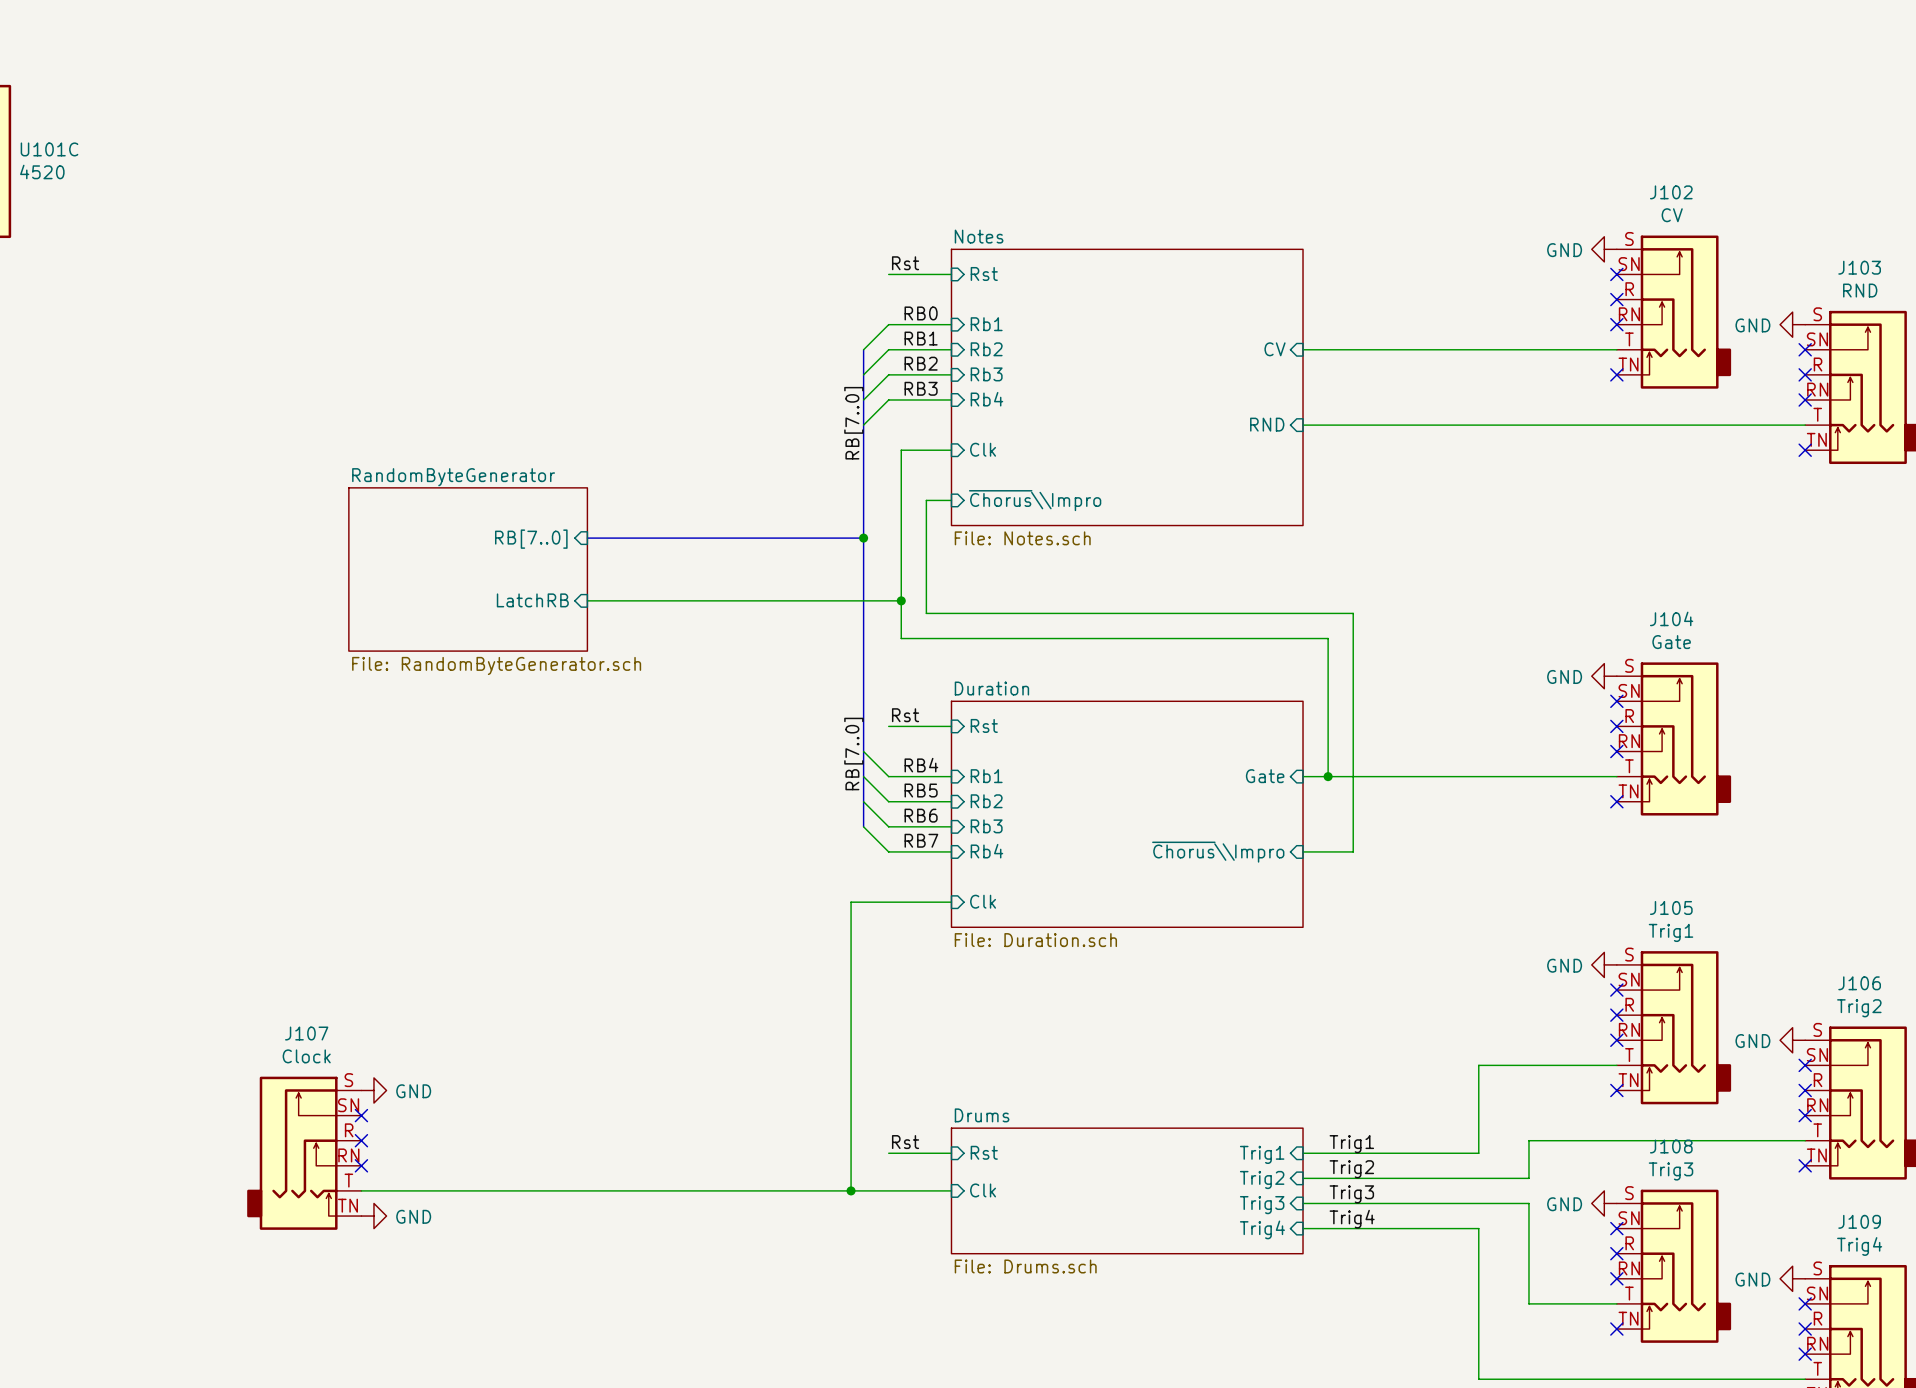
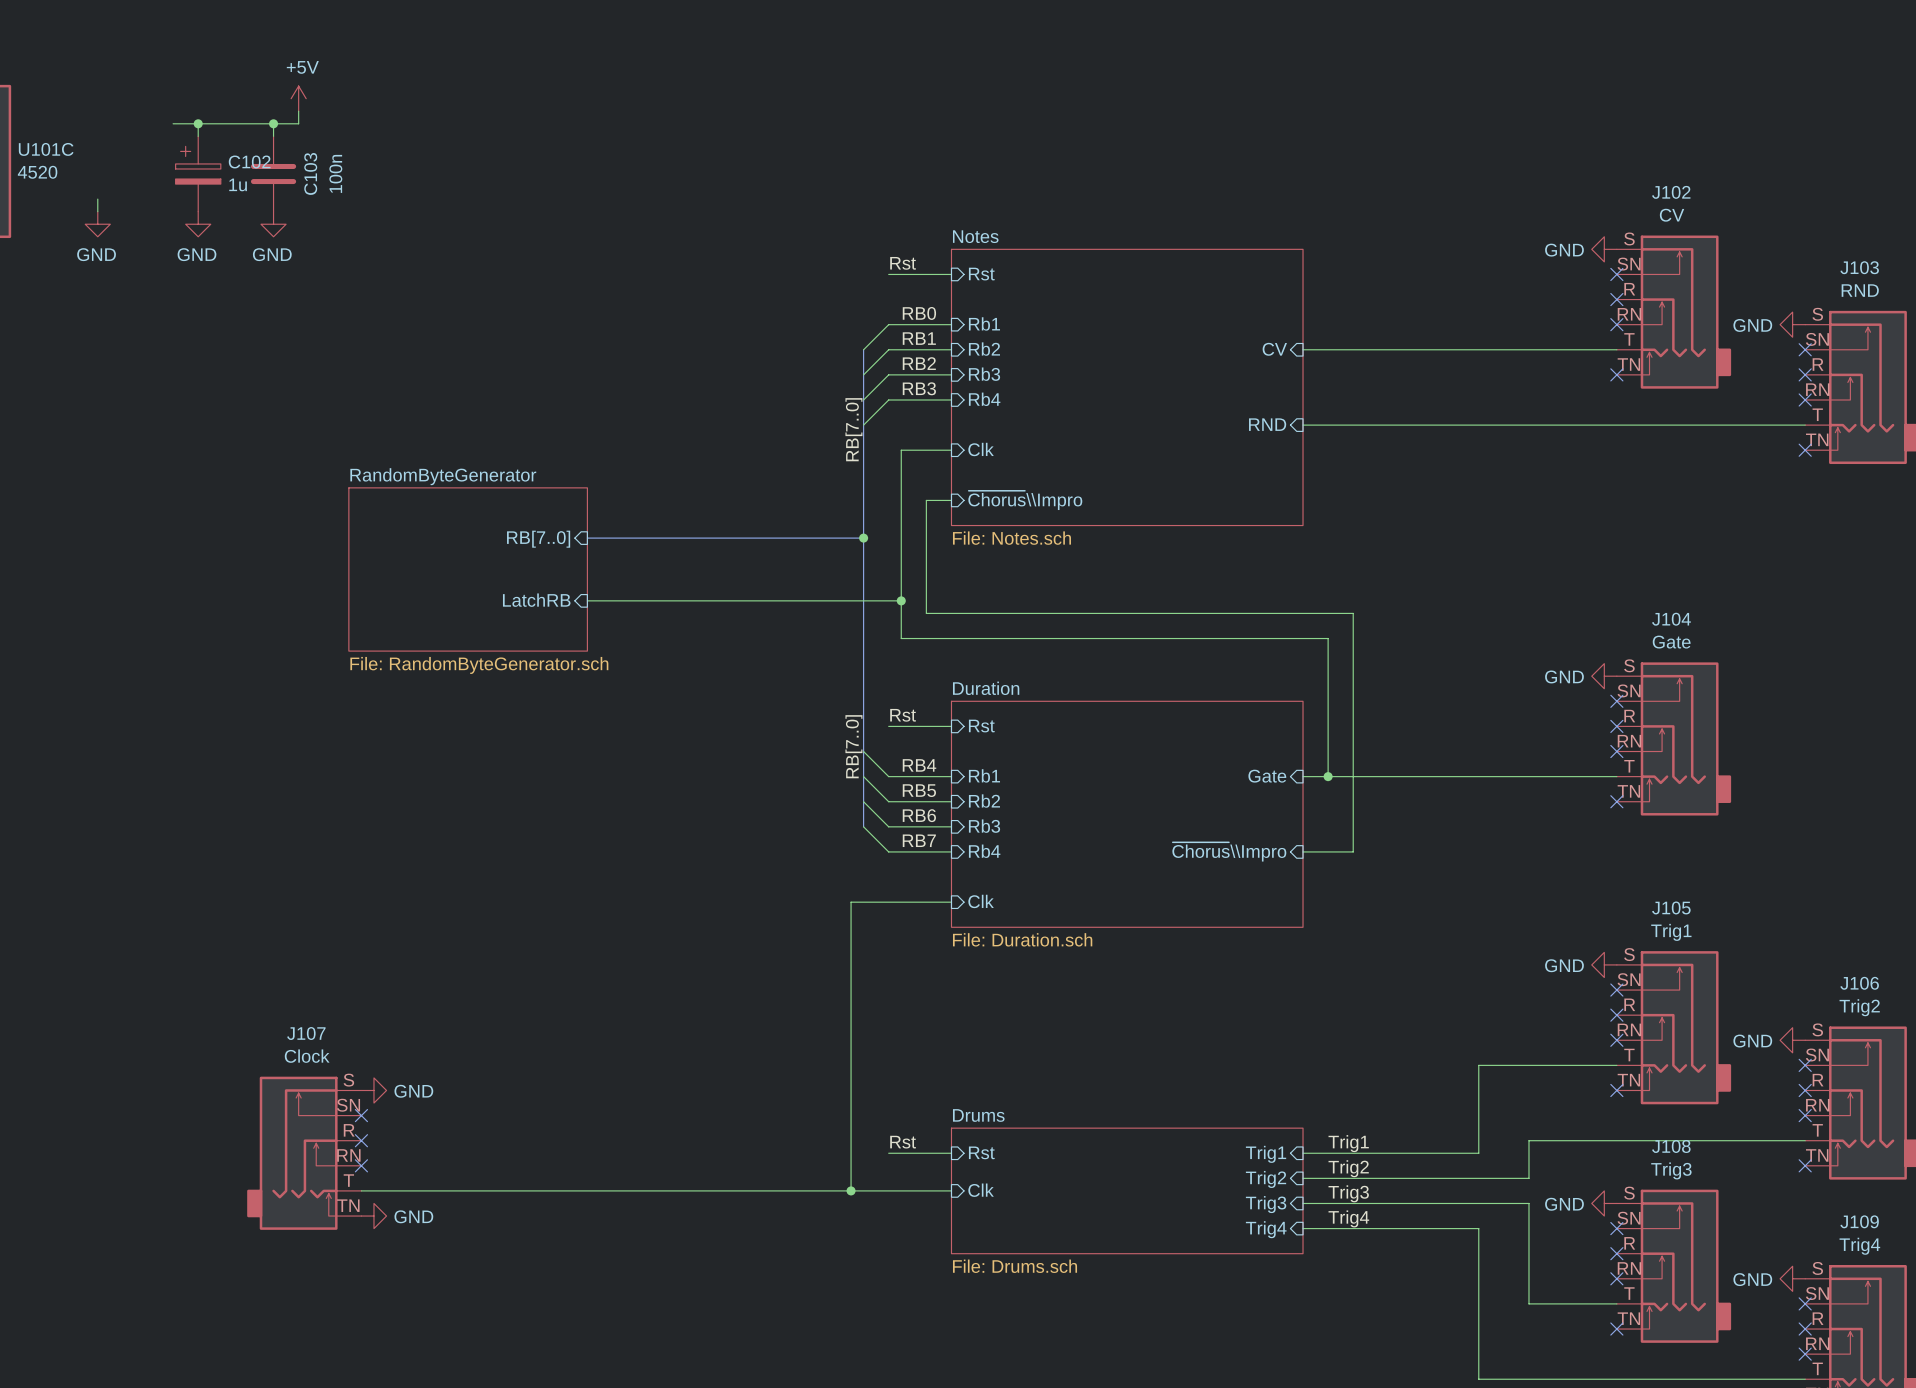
power symbol: none -> +5V (298, 98)
wire: none -> (298, 111) (298, 123) (173, 123)
wire: none -> (198, 123) (198, 136)
junction: none -> (198, 123)
wire: none -> (273, 123) (273, 136)
junction: none -> (273, 123)
C102: none -> 1u (198, 174)
C103: none -> 100n (273, 174)
wire: none -> (97, 199) (97, 211)
power symbol: none -> GND (97, 224)
power symbol: none -> GND (198, 224)
power symbol: none -> GND (273, 224)

